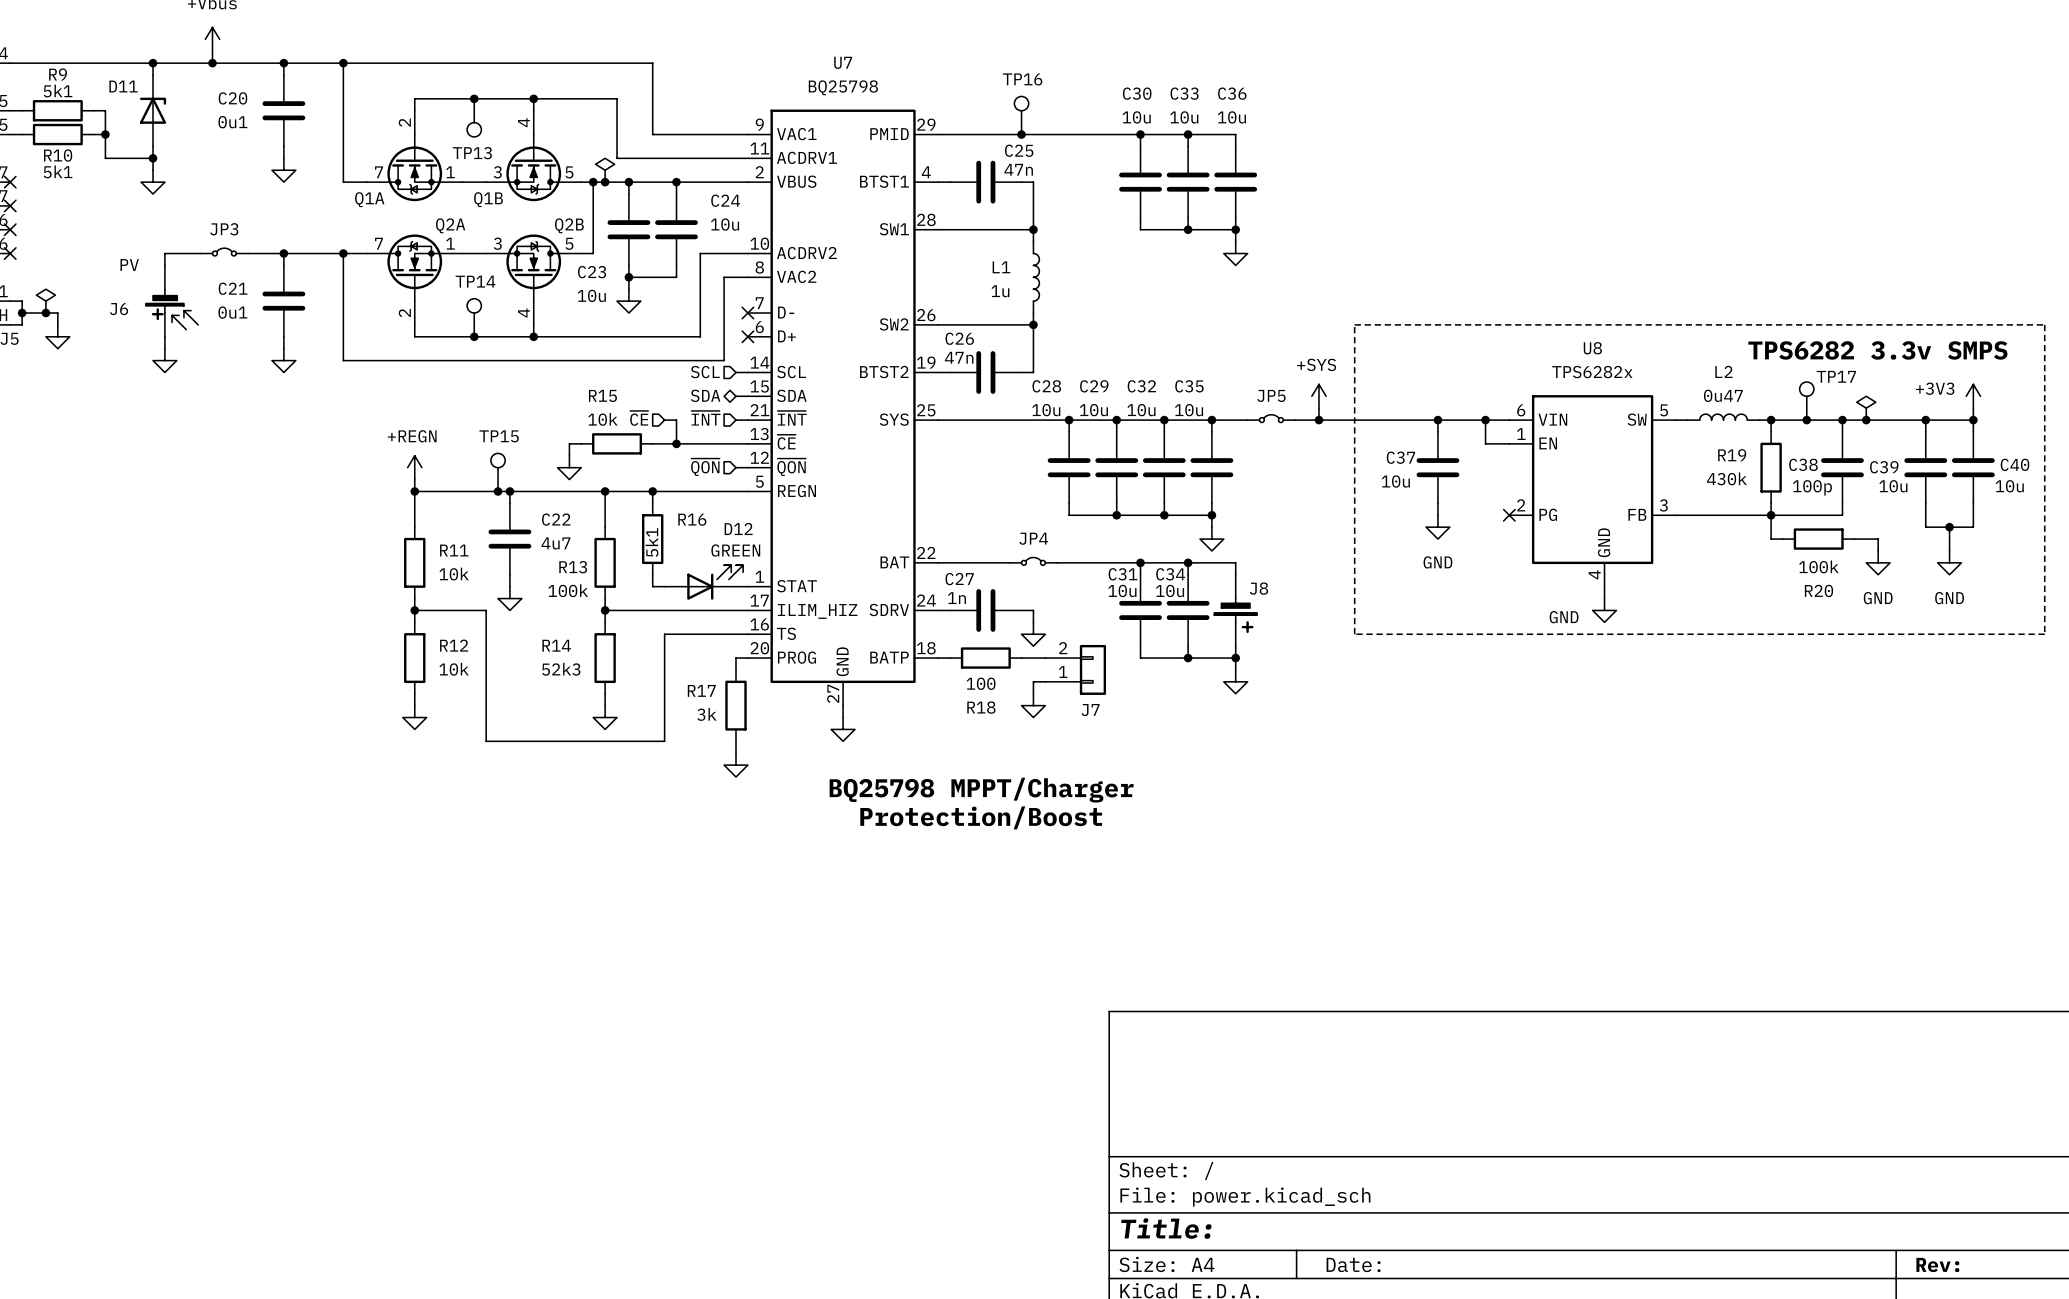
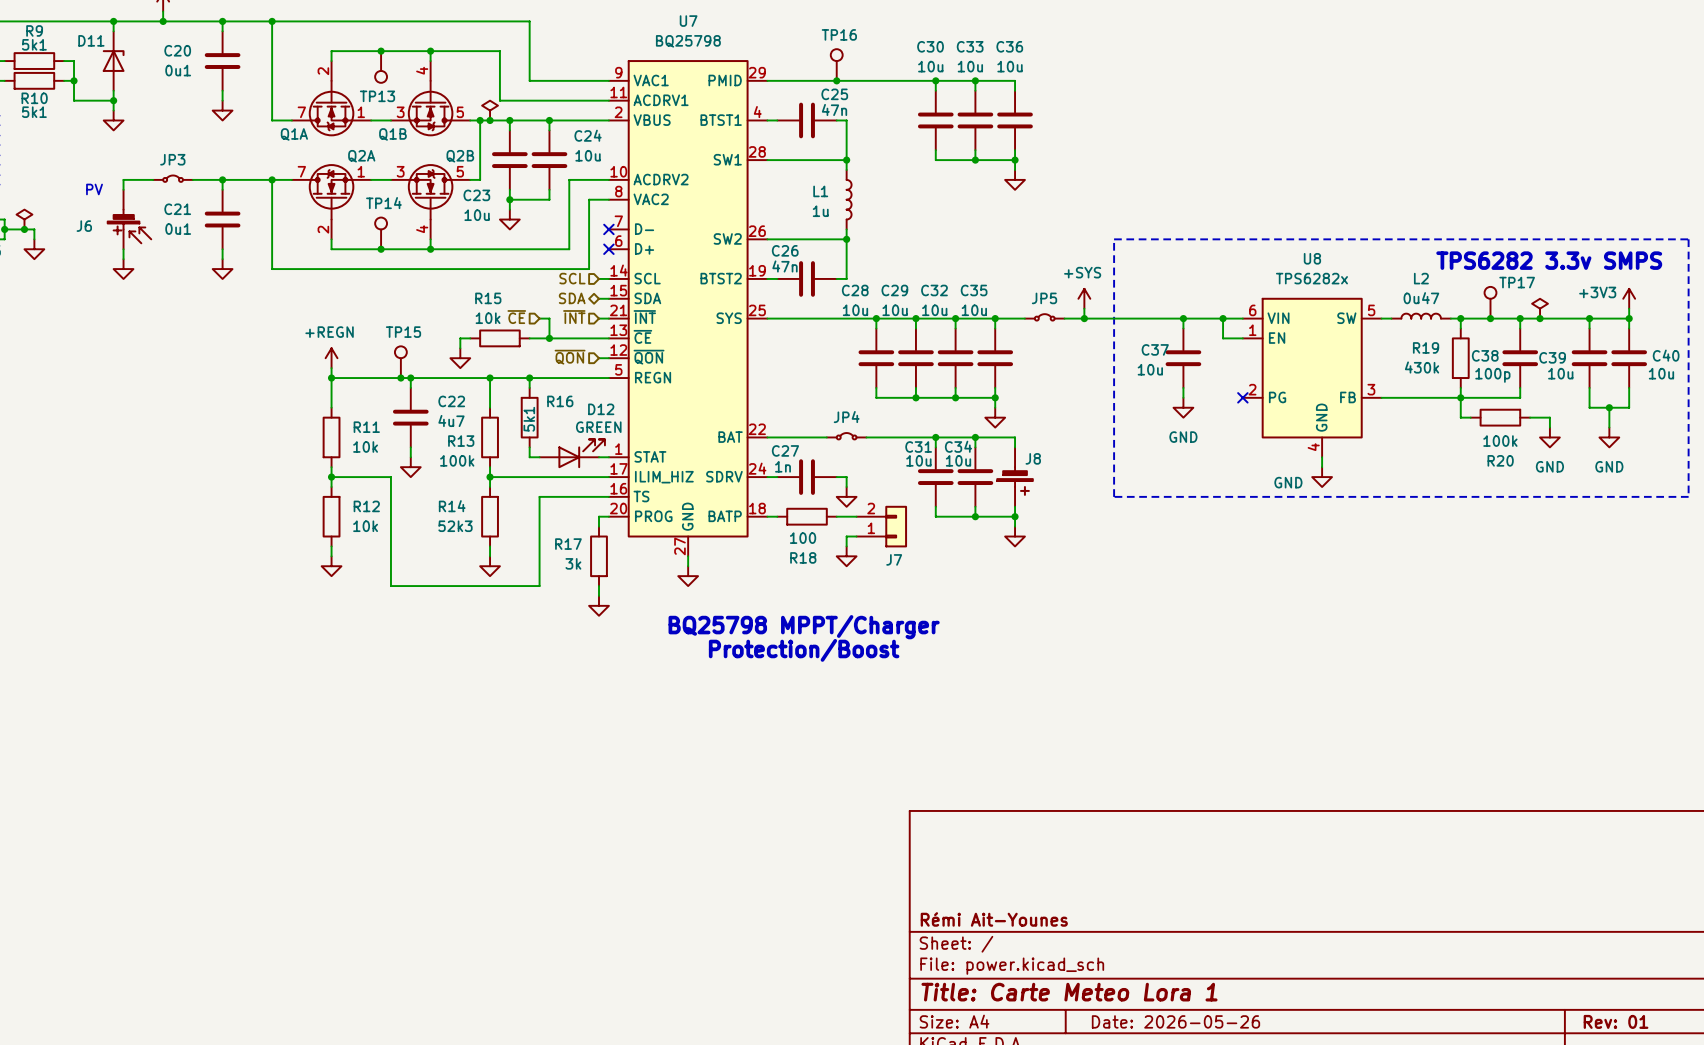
title block: none -> Rémi Ait-Younes (994, 919)
title block: Title: (1166, 1228) -> Title: Carte Meteo Lora 1 (1069, 992)
title block: Date: (1353, 1264) -> Date: 2026-05-26 (1175, 1021)
title block: Rev: (1937, 1264) -> Rev: 01 (1616, 1021)

